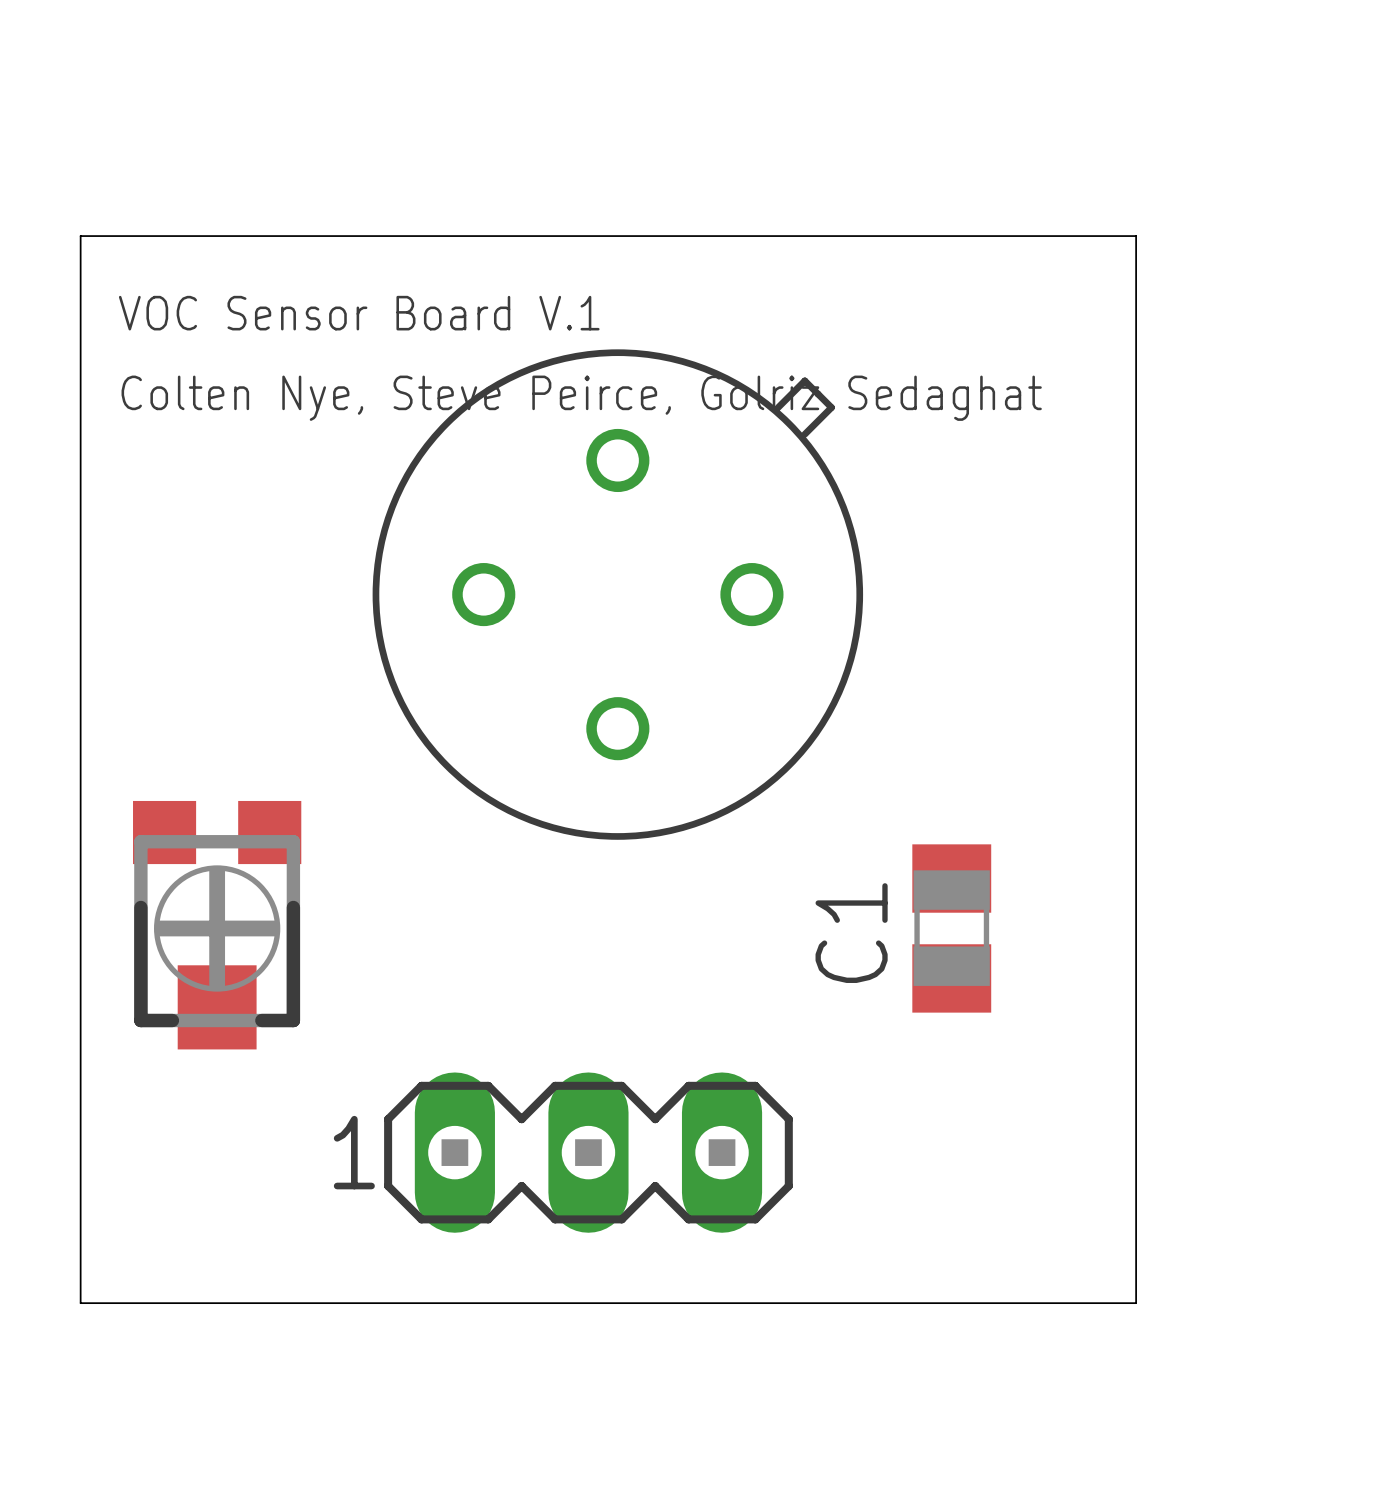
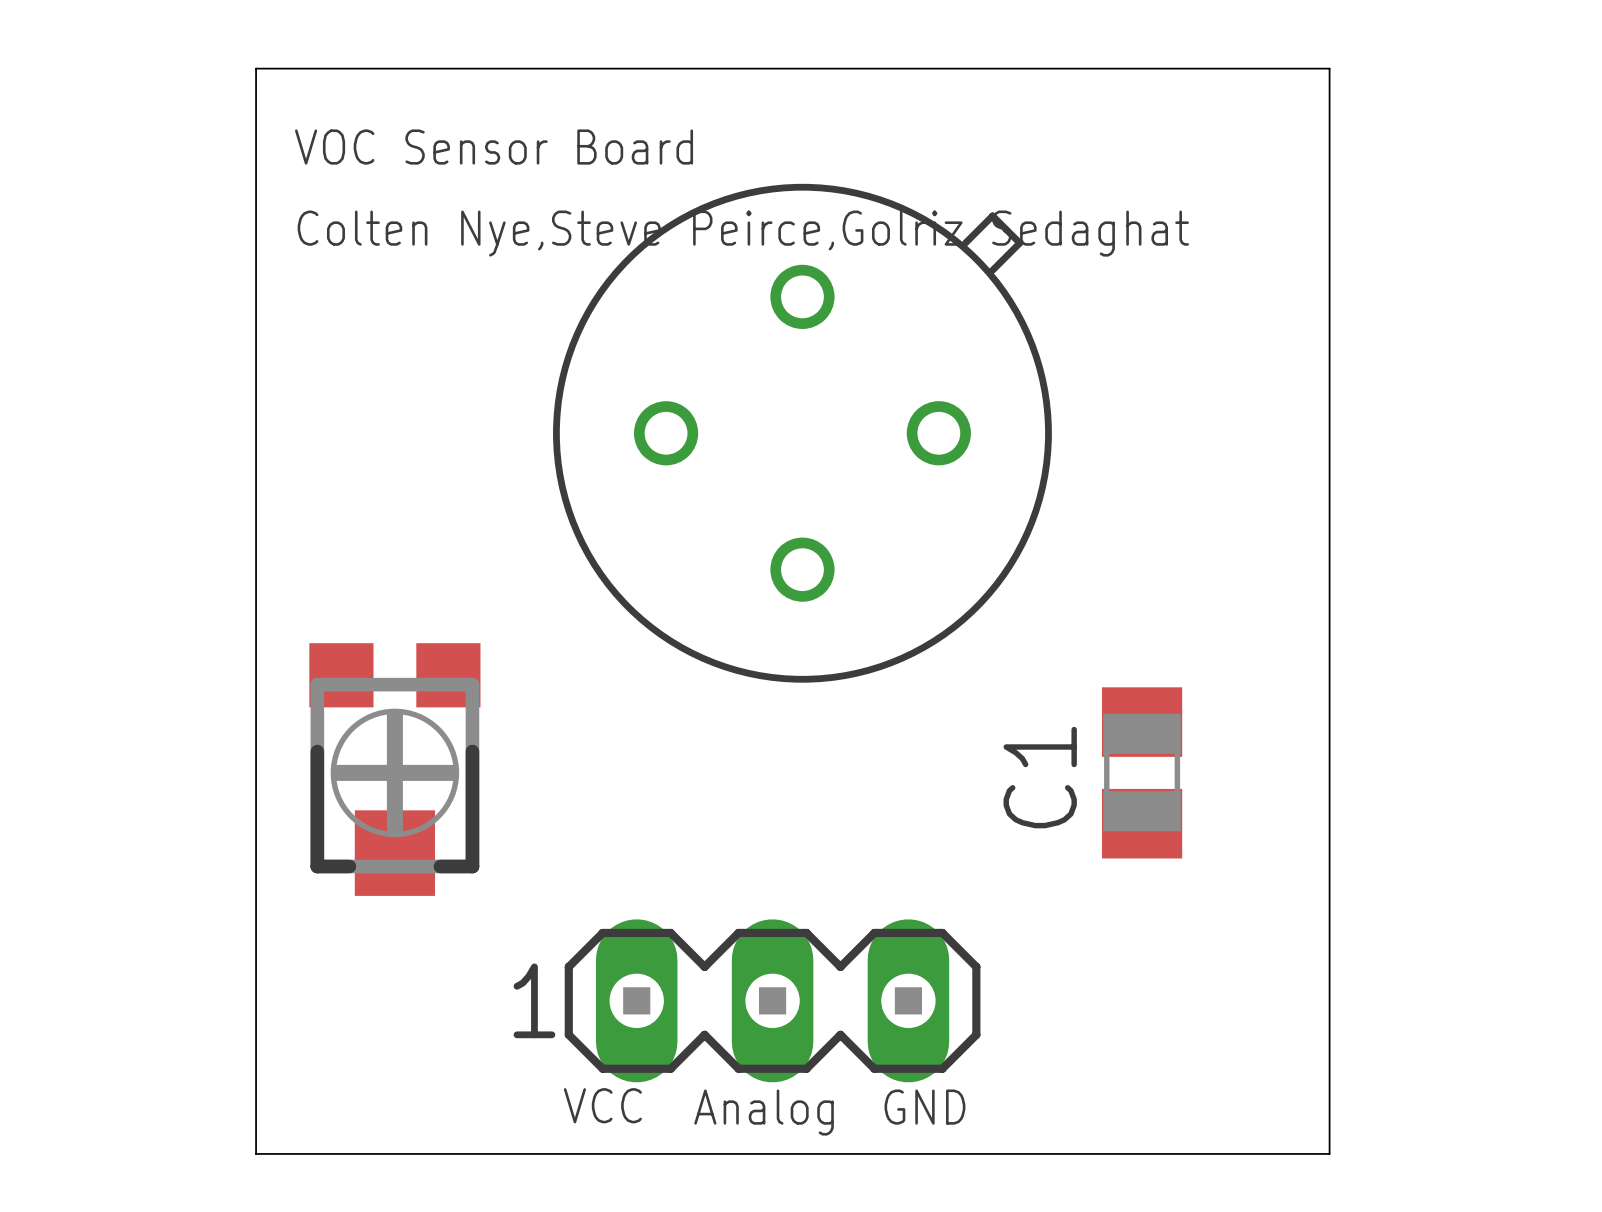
text: VOC Sensor Board V.1 (359, 313) -> VOC Sensor Board (494, 147)
text: Colten Nye, Steve Peirce, Golriz Sedaghat (581, 398) -> Colten Nye,Steve Peirce,Golriz Sedaghat (743, 233)
text: none -> VCC (602, 1105)
text: none -> GND (924, 1107)
text: none -> Analog (764, 1112)

